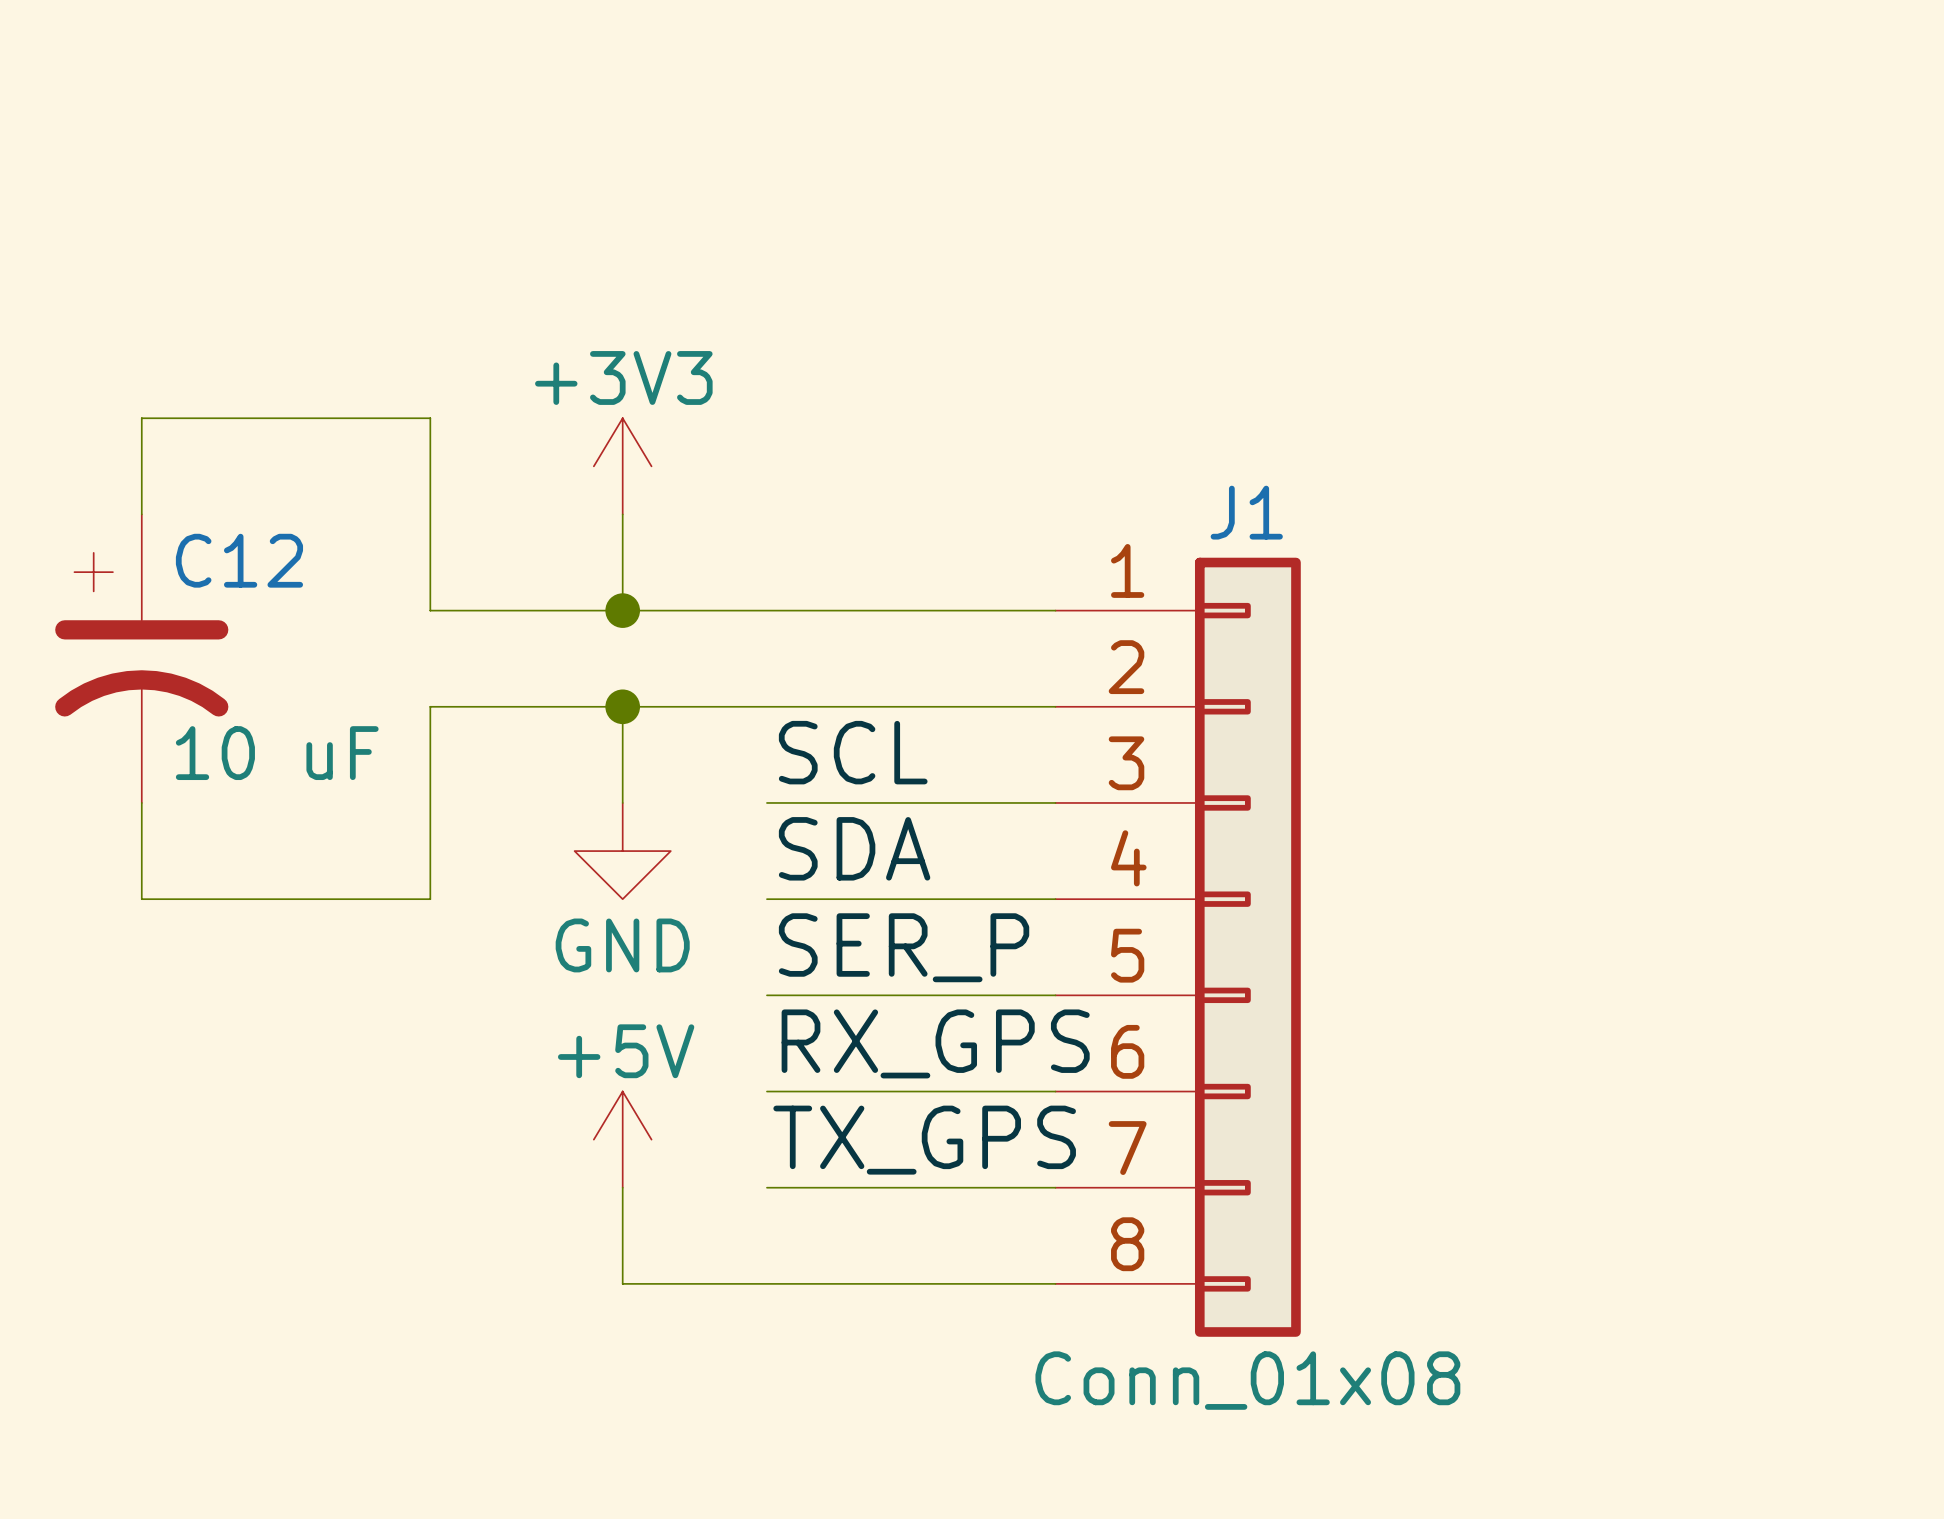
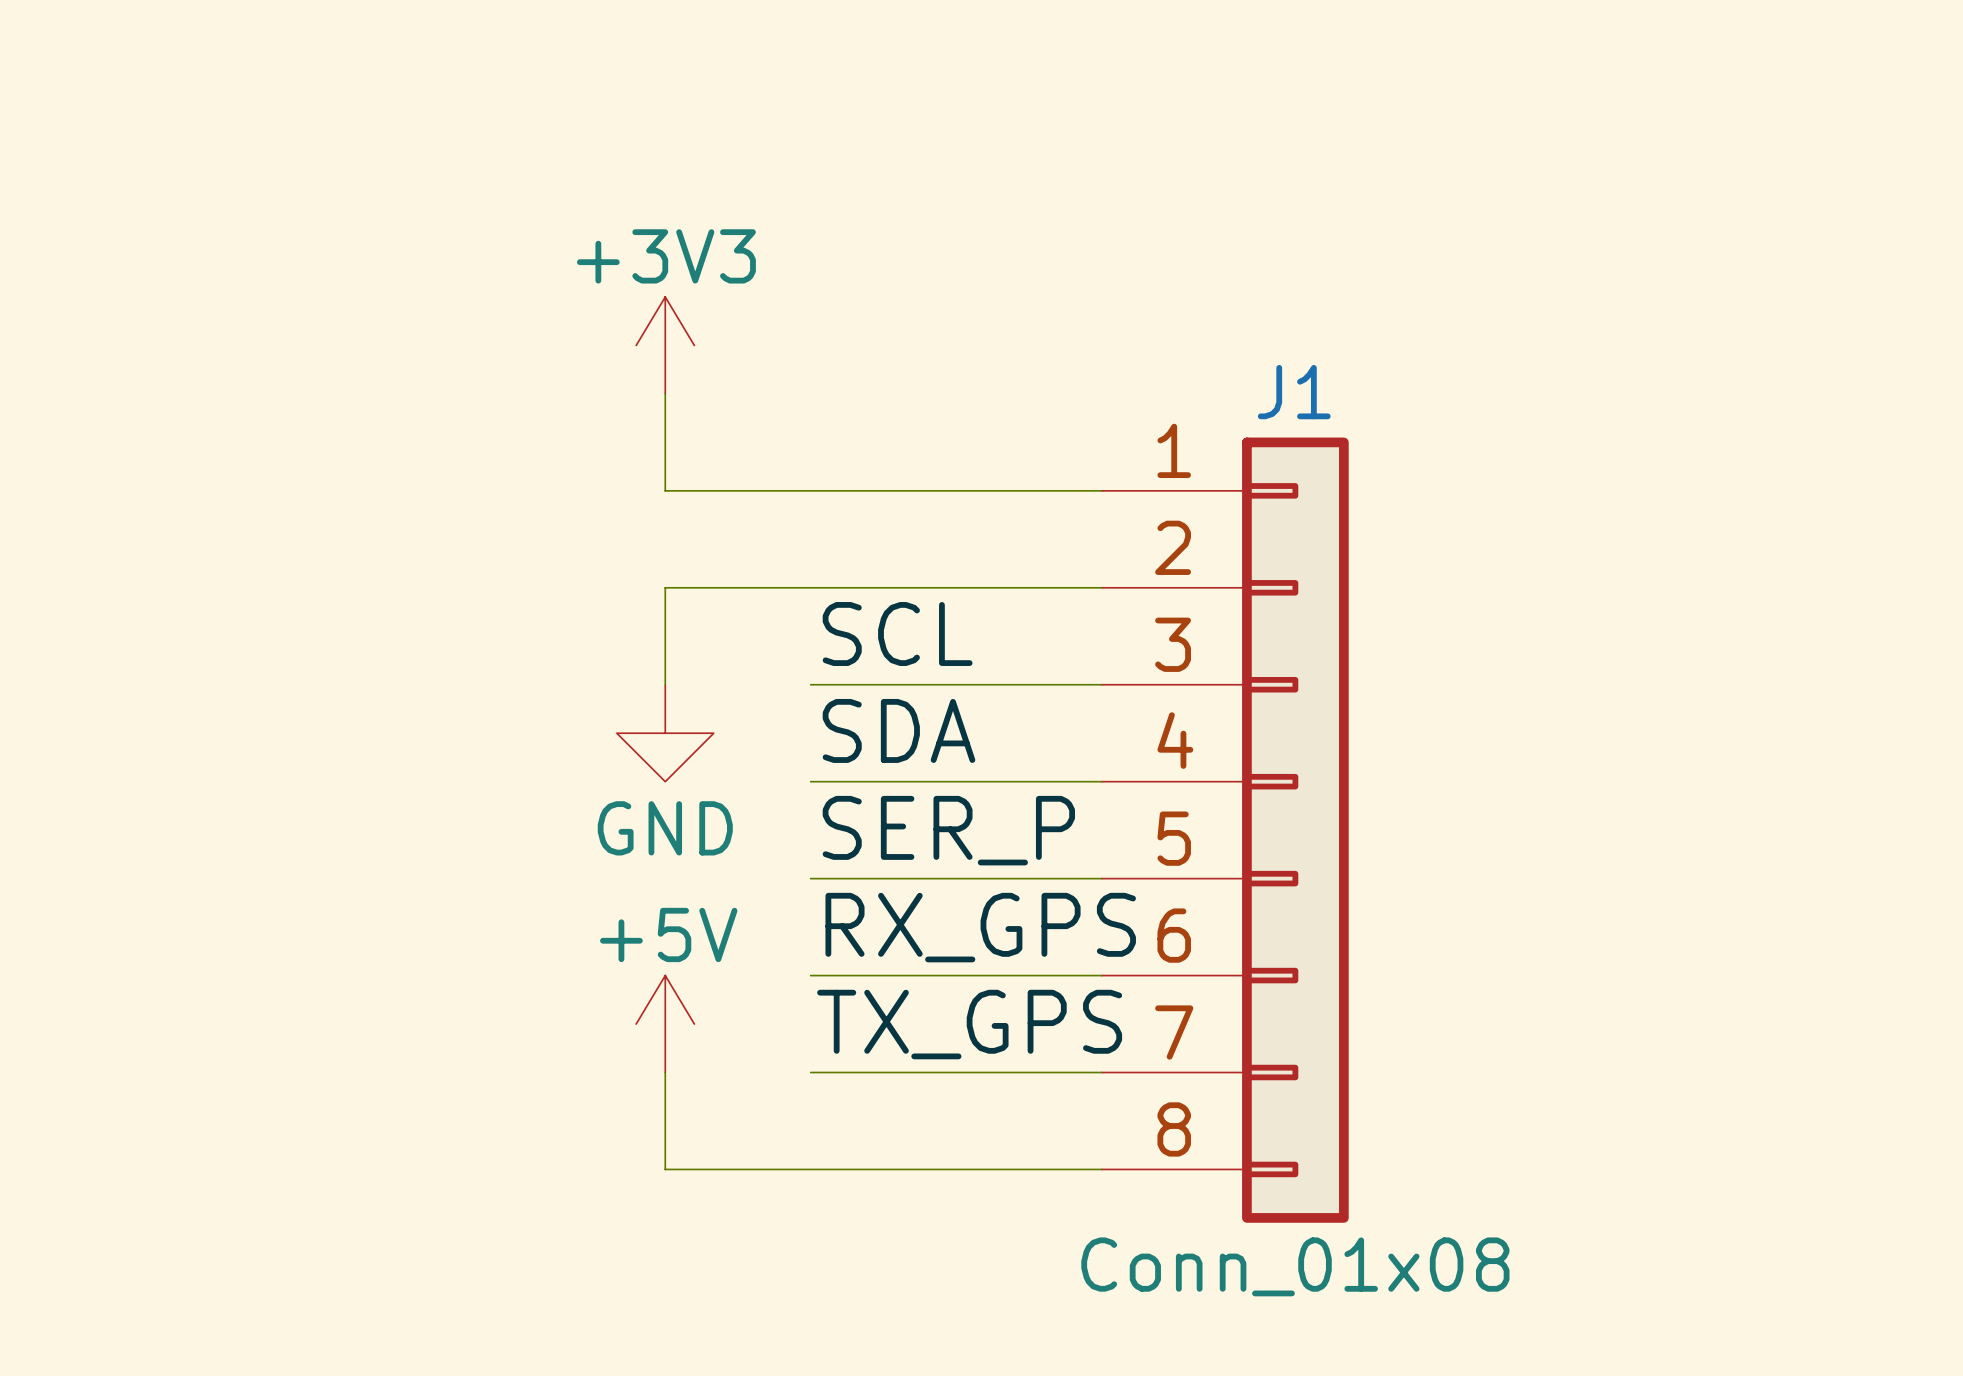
wire: (141, 514) (141, 418) (430, 418) (430, 610) (622, 610) -> none
junction: (622, 610) -> none
C12: 10 uF (141, 658) -> none
wire: (622, 706) (430, 706) (430, 899) (141, 899) (141, 802) -> none
junction: (622, 706) -> none

